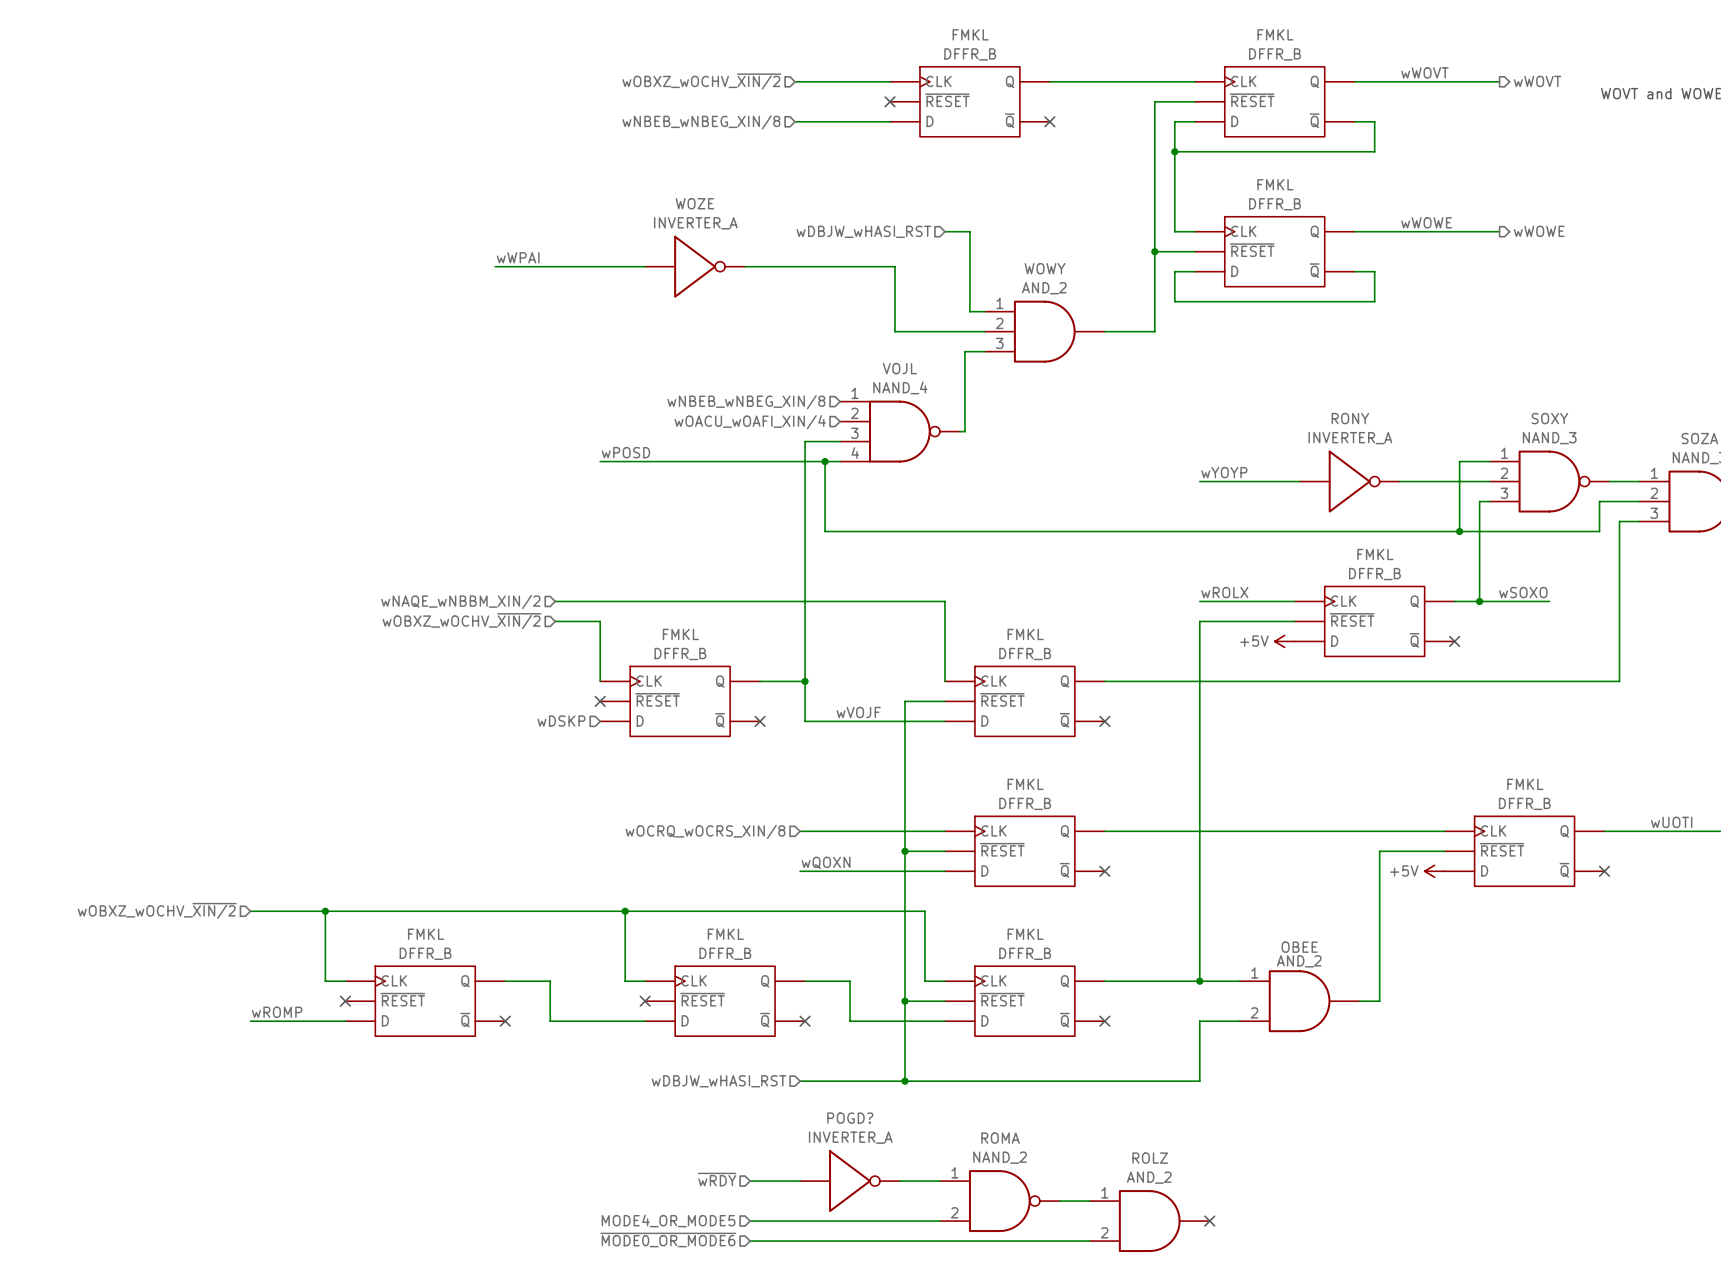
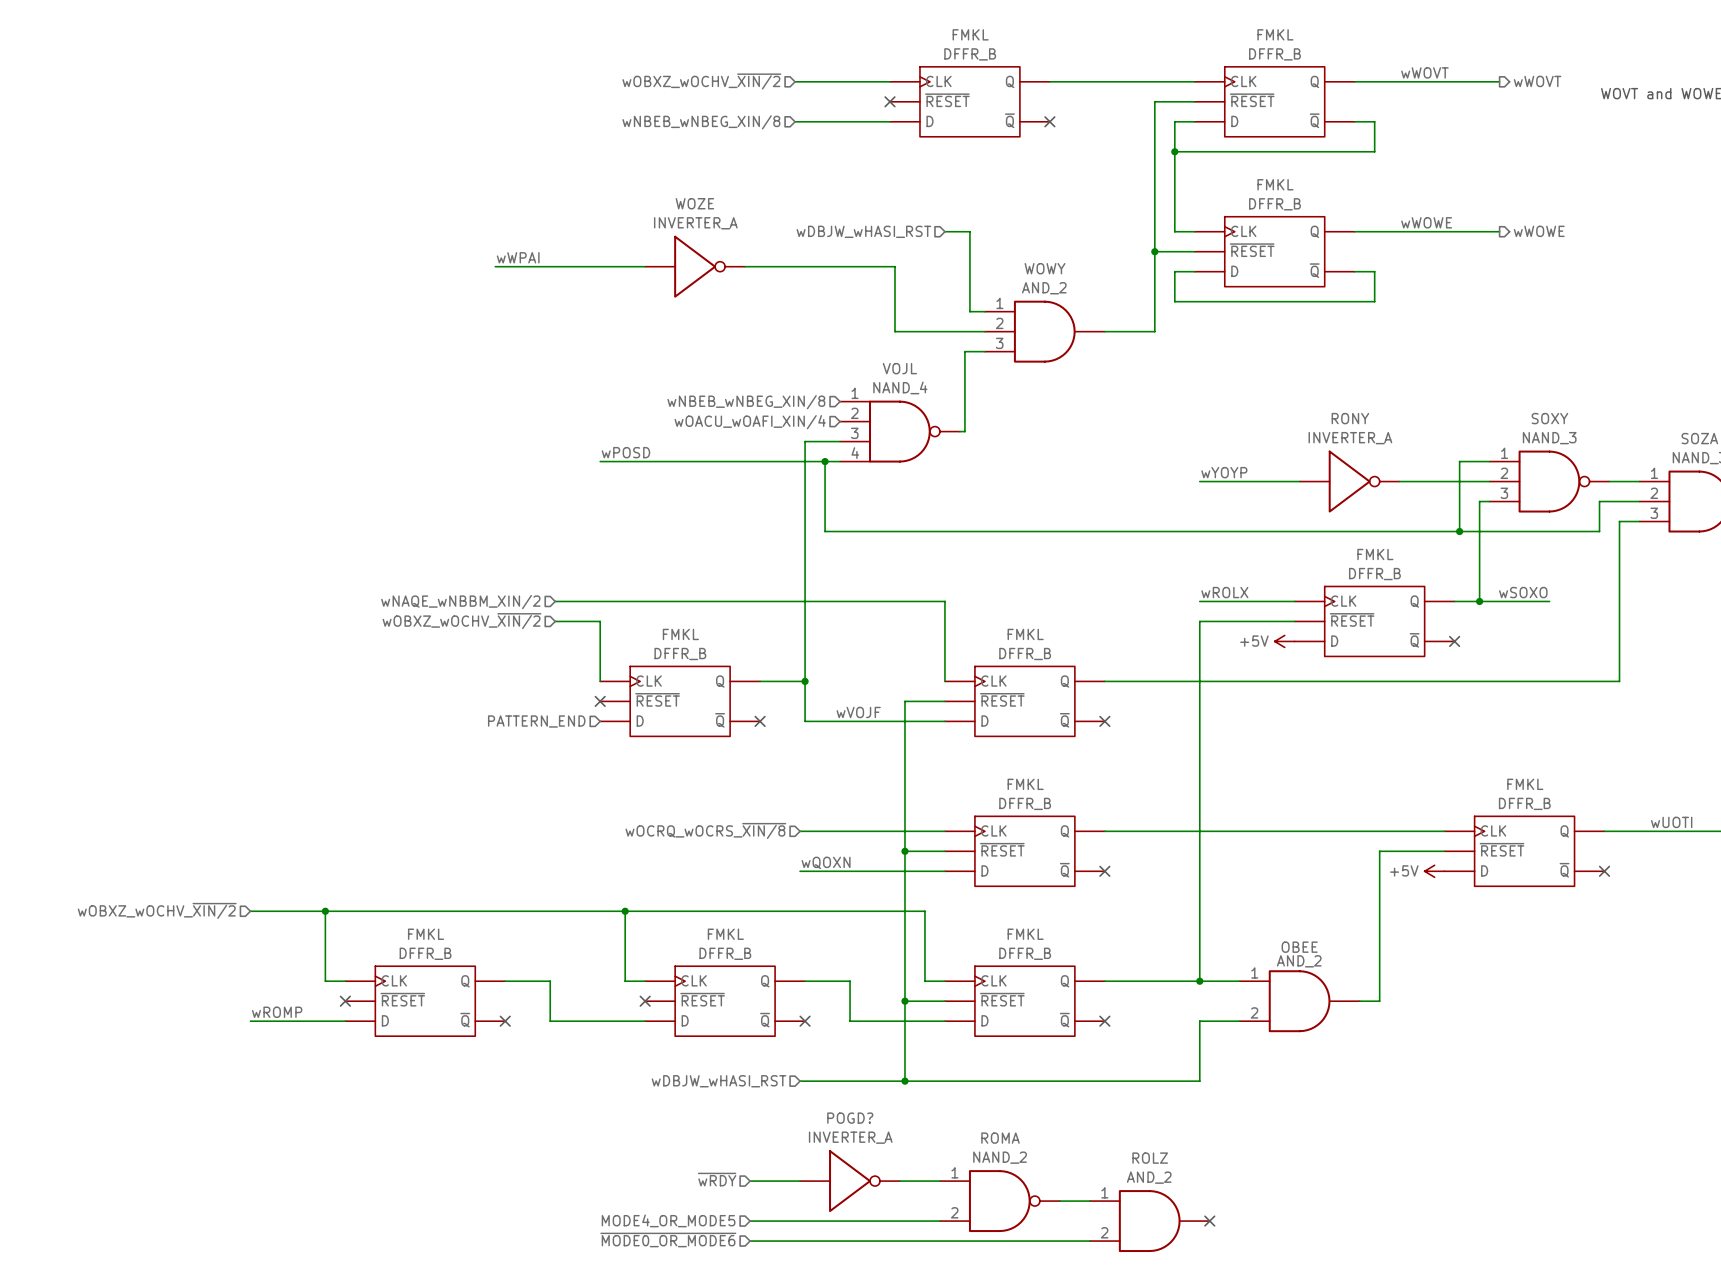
hierarchical label: wDSKP (561, 721) -> PATTERN_END (536, 721)
hierarchical label: wOCRQ_wOCRS_XIN/8 (705, 831) -> wOCRQ_wOCRS_~{XIN/8} (705, 830)

